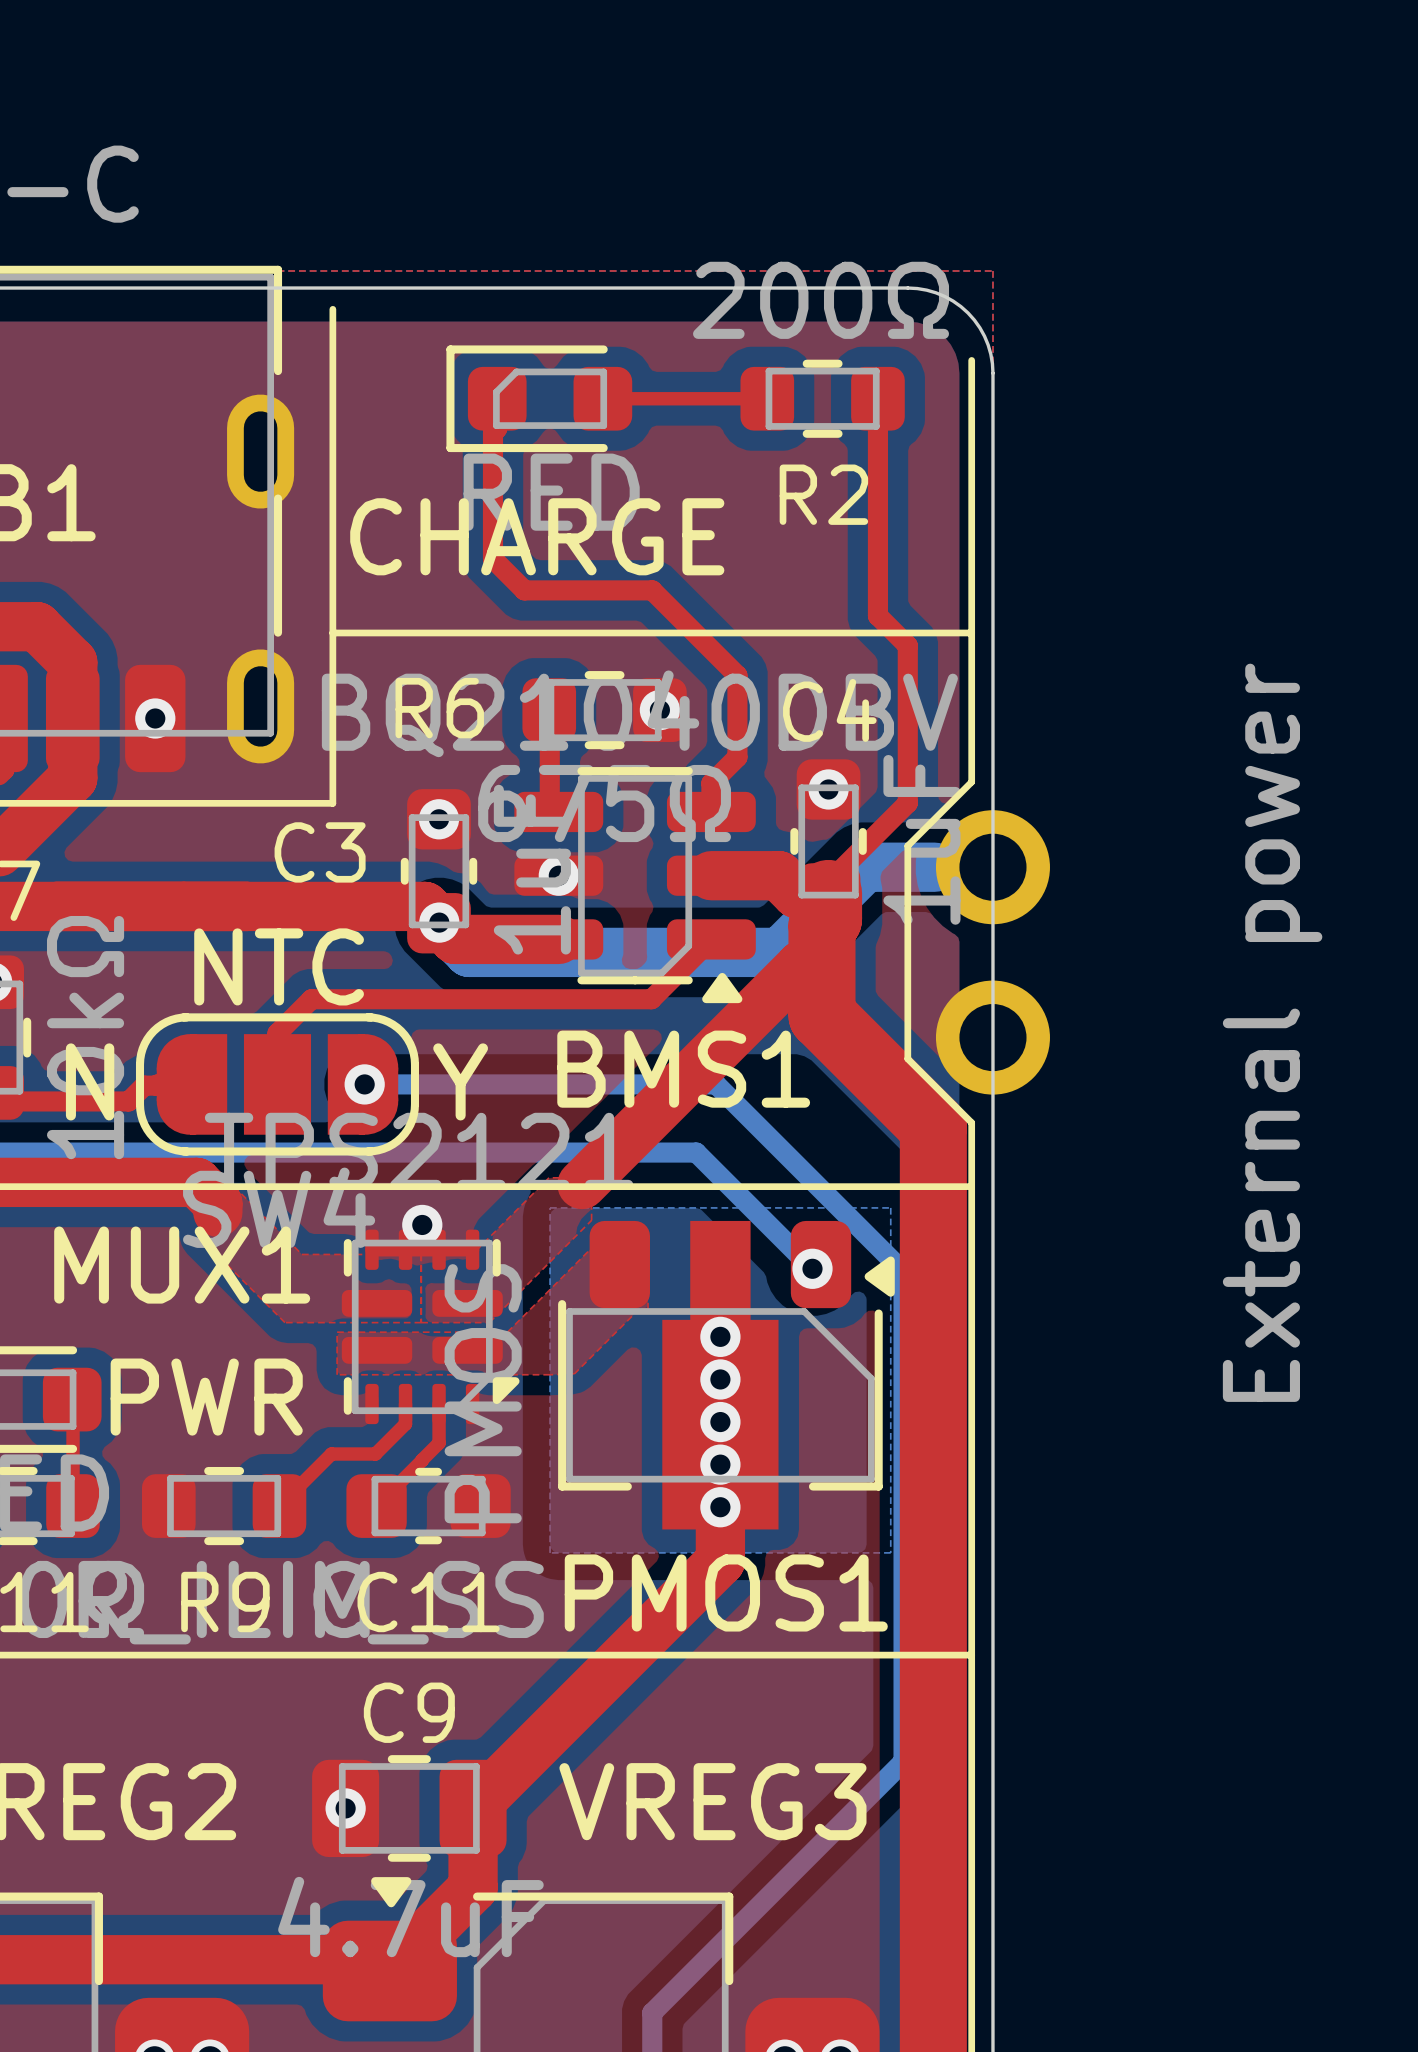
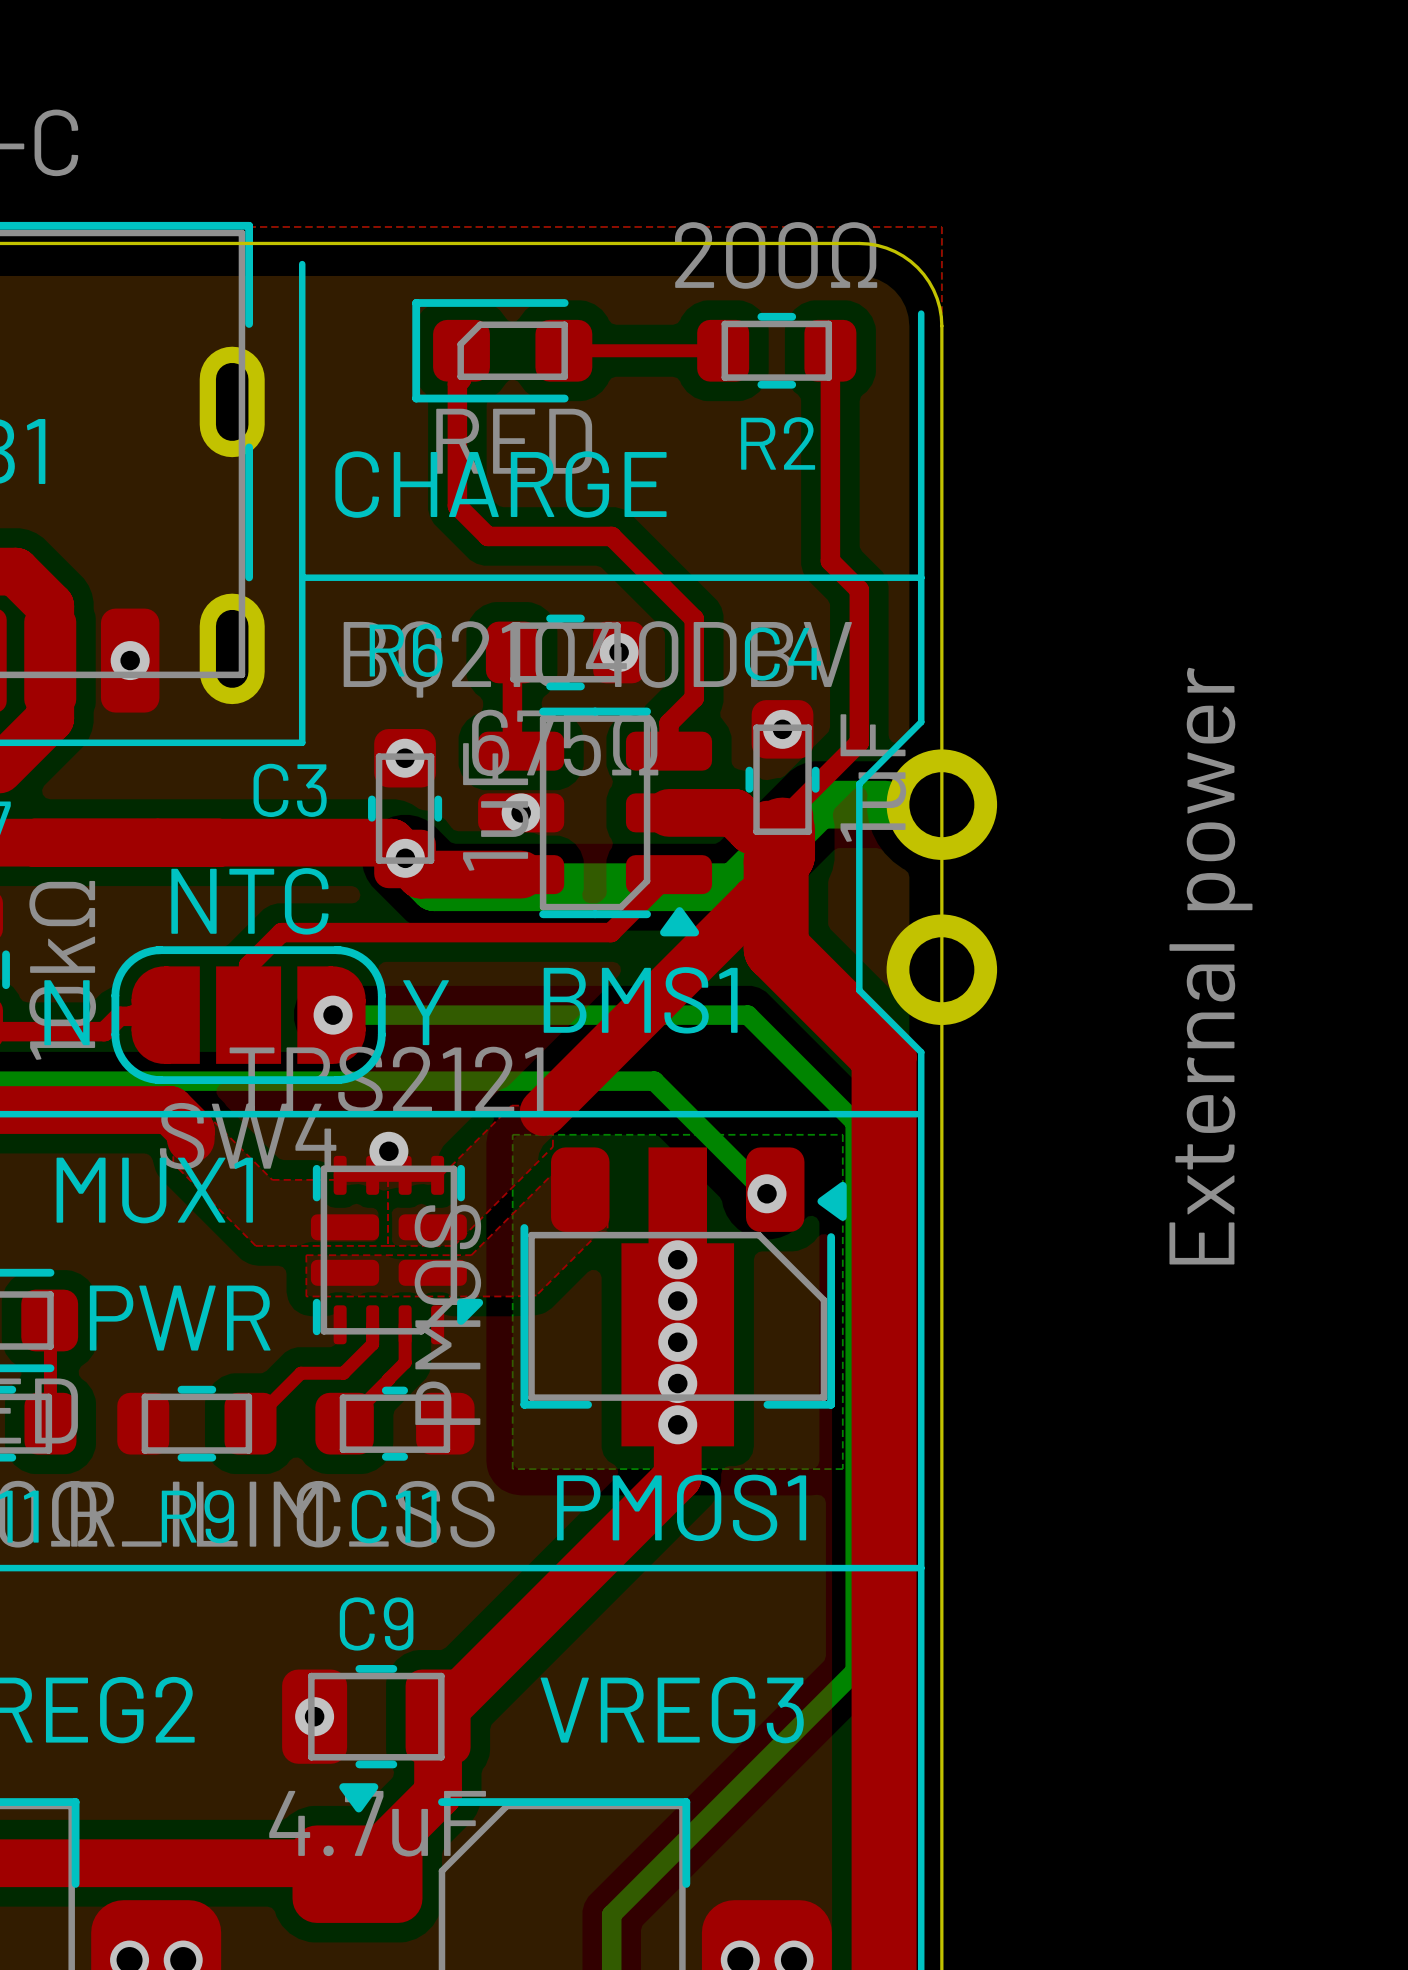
bottom track: (716, 1084) (903, 1271) -> (673, 1015) (747, 1015) (855, 1122) (855, 1196)

